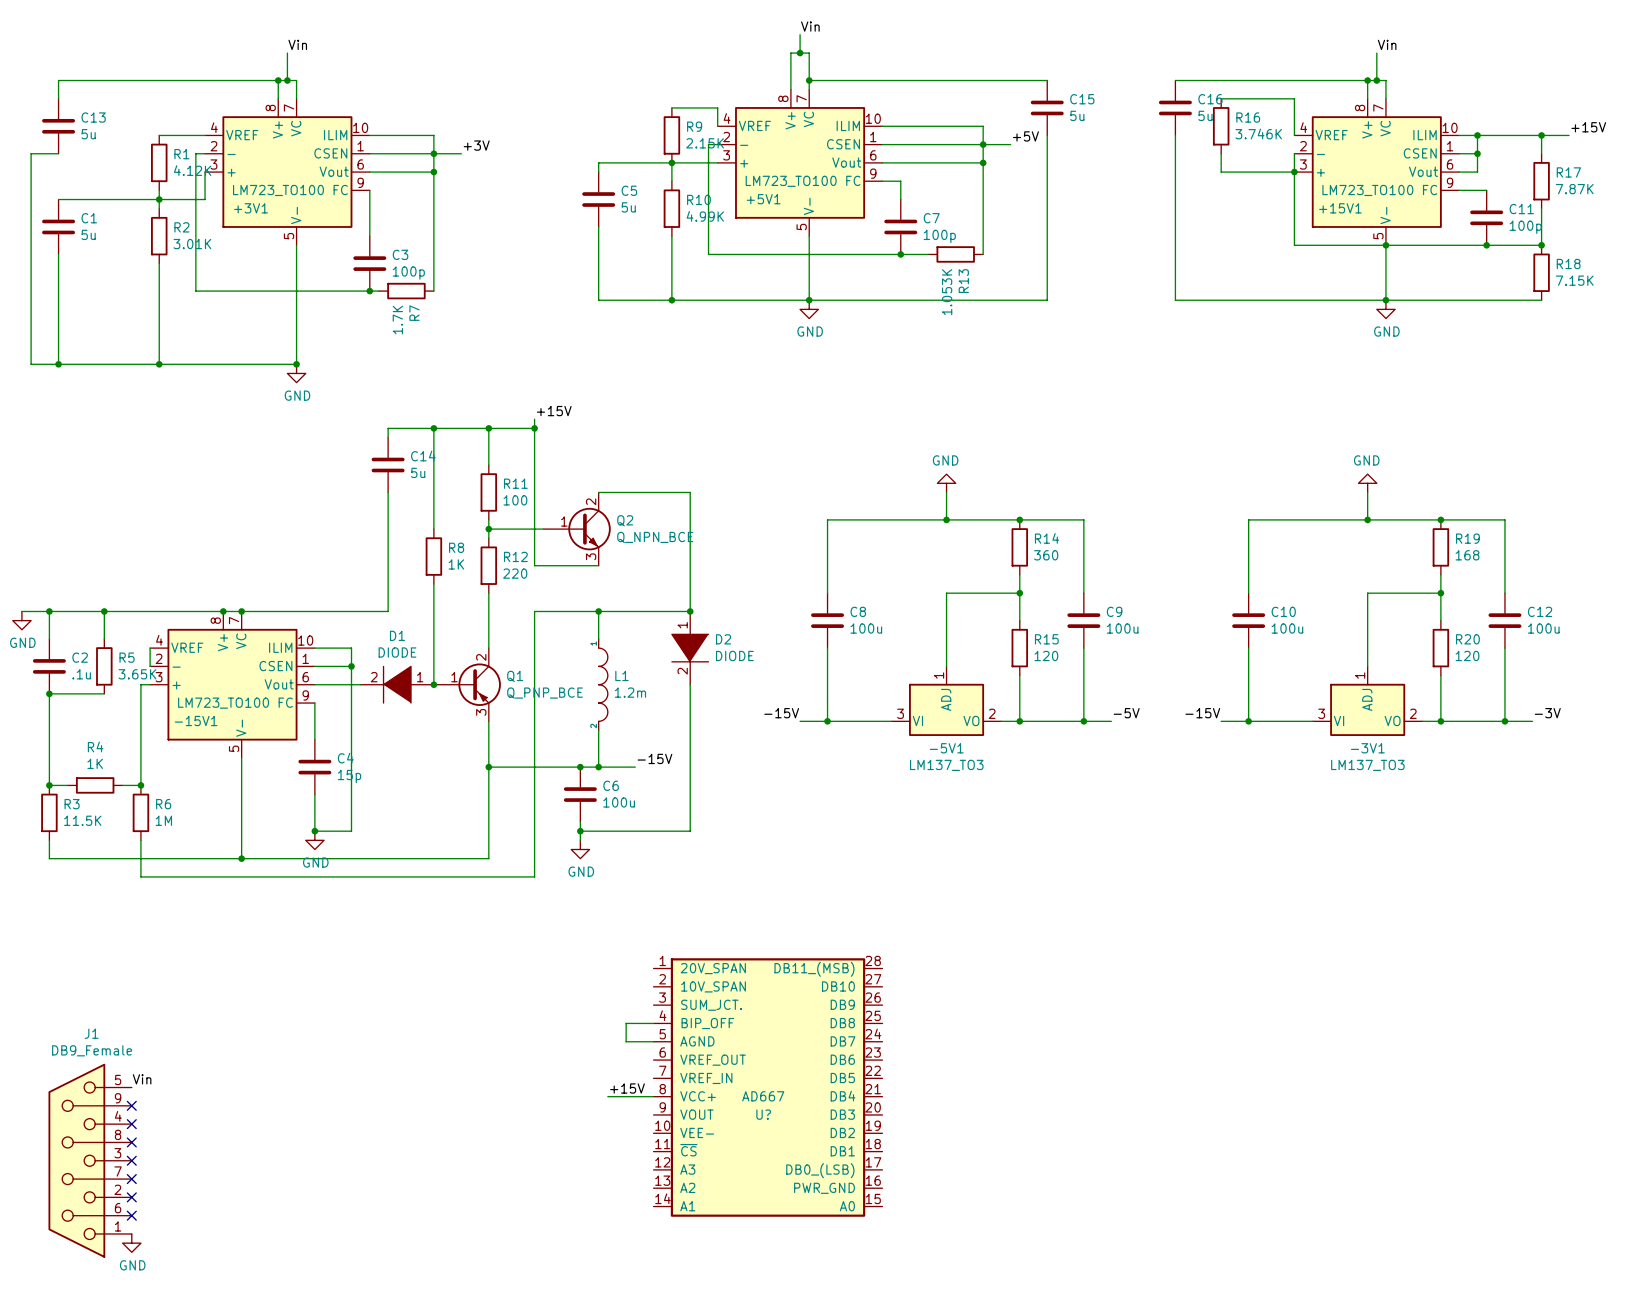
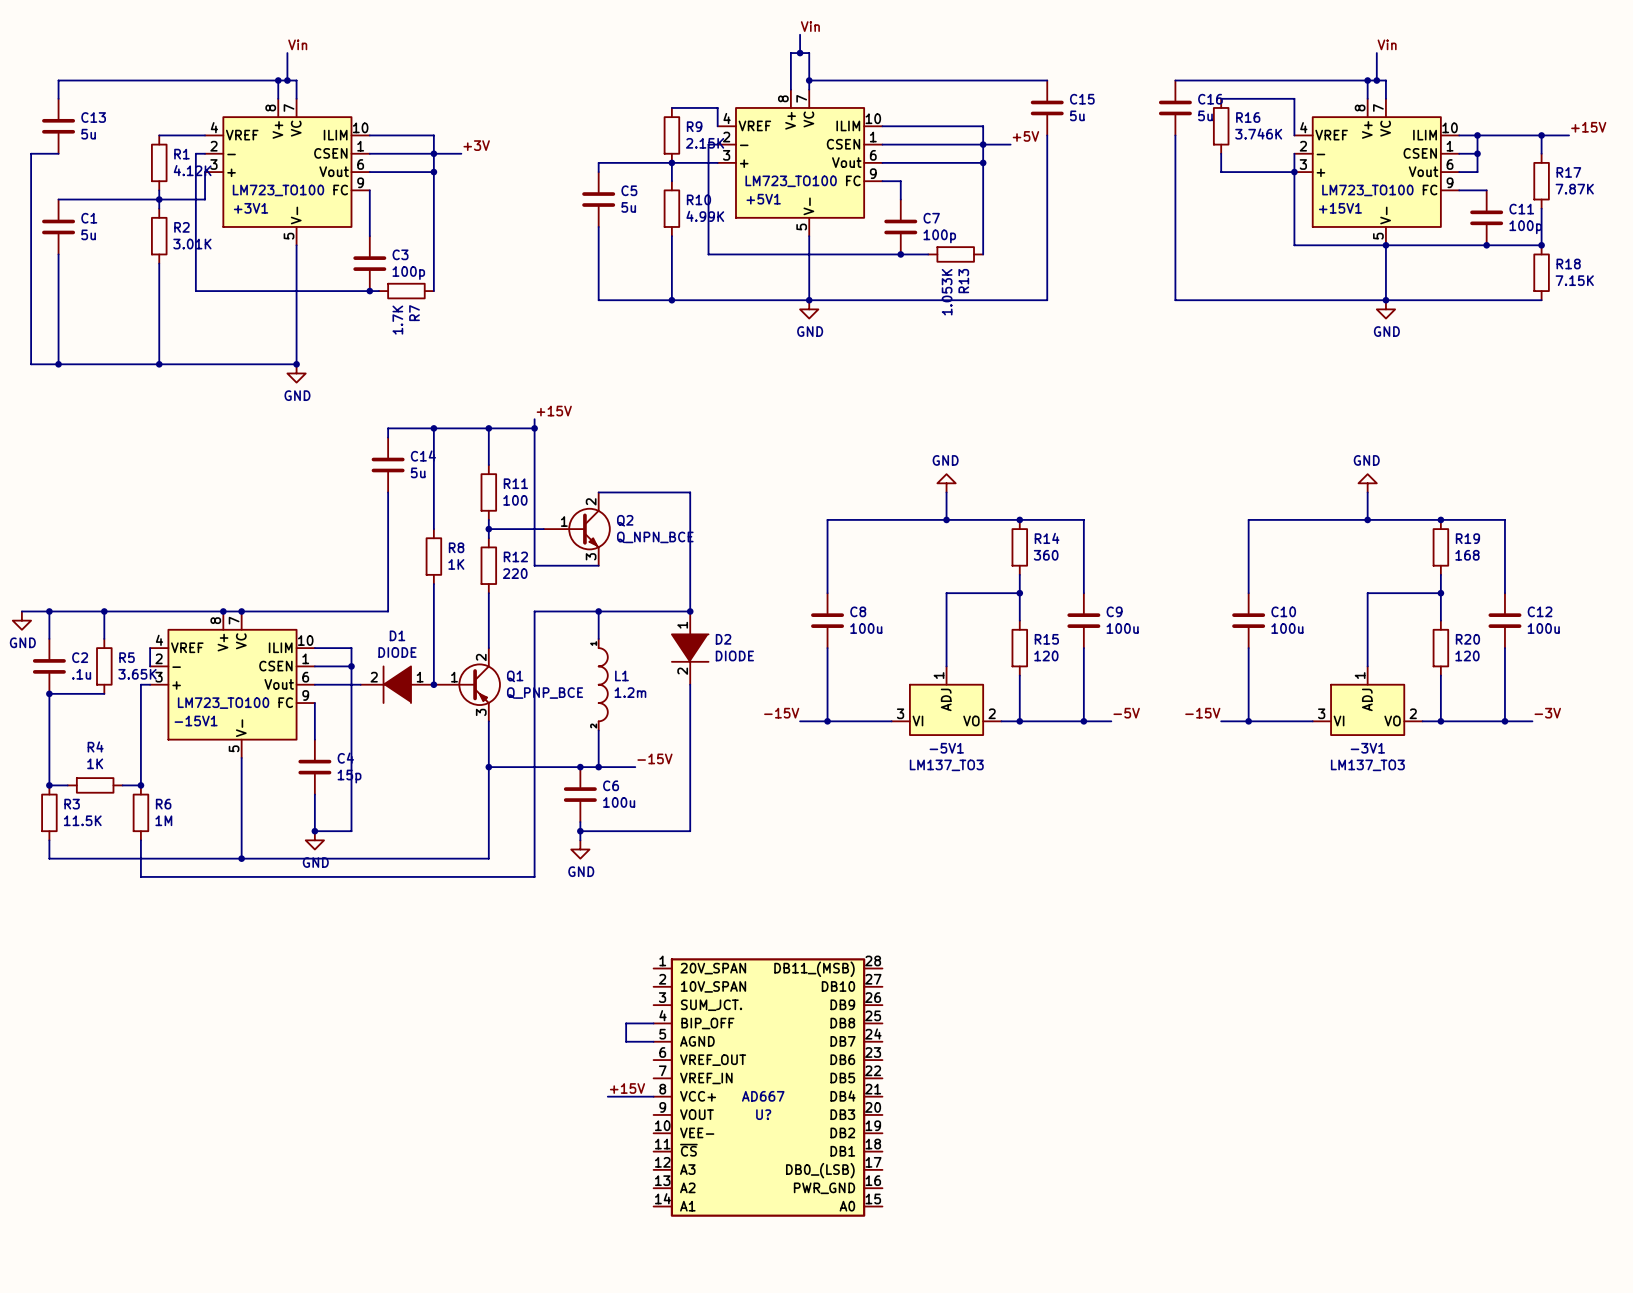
label: Vin (142, 1079) -> none
no-connect mark: (131, 1105) -> none
no-connect mark: (131, 1124) -> none
no-connect mark: (131, 1142) -> none
J1: DB9_Female (90, 1160) -> none
no-connect mark: (131, 1160) -> none
no-connect mark: (131, 1179) -> none
no-connect mark: (131, 1197) -> none
no-connect mark: (131, 1215) -> none
power symbol: GND (131, 1243) -> none

